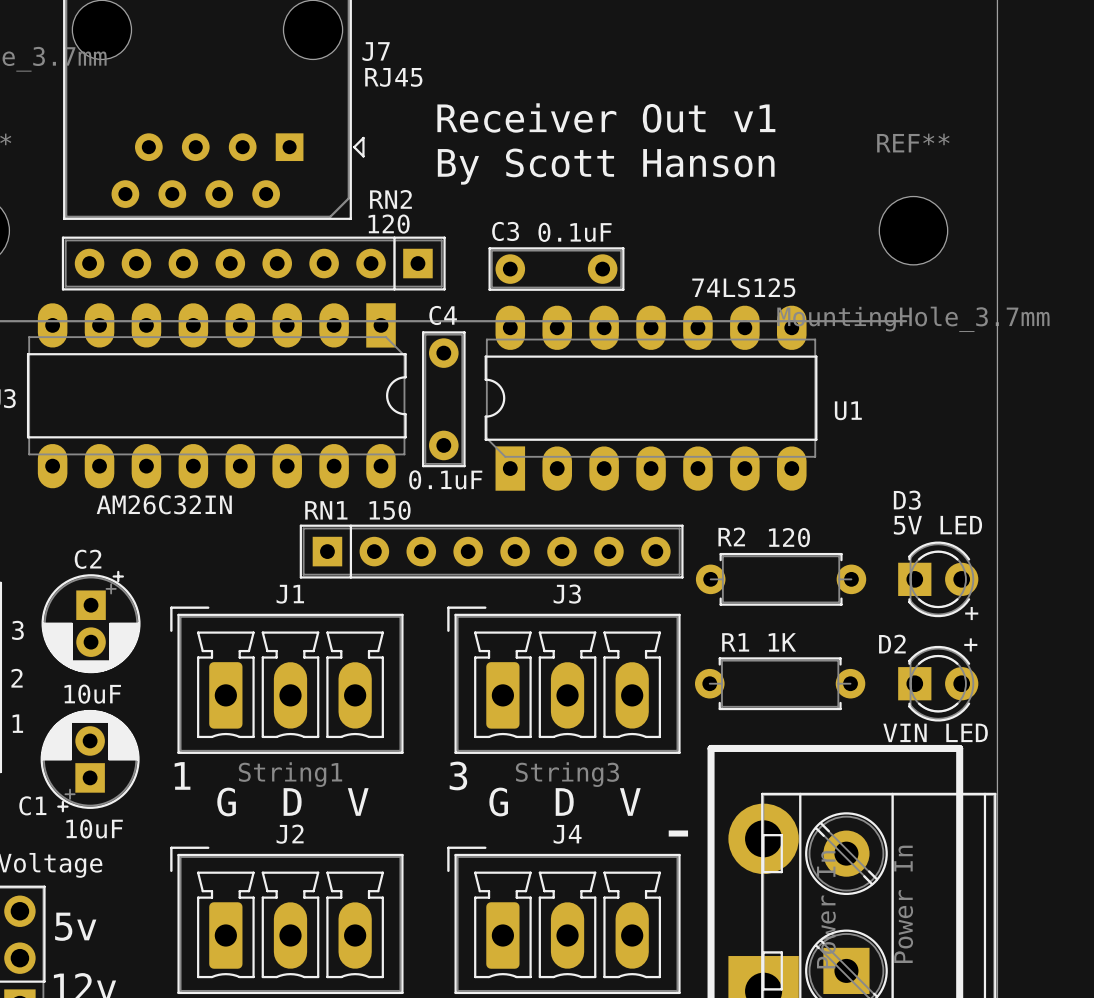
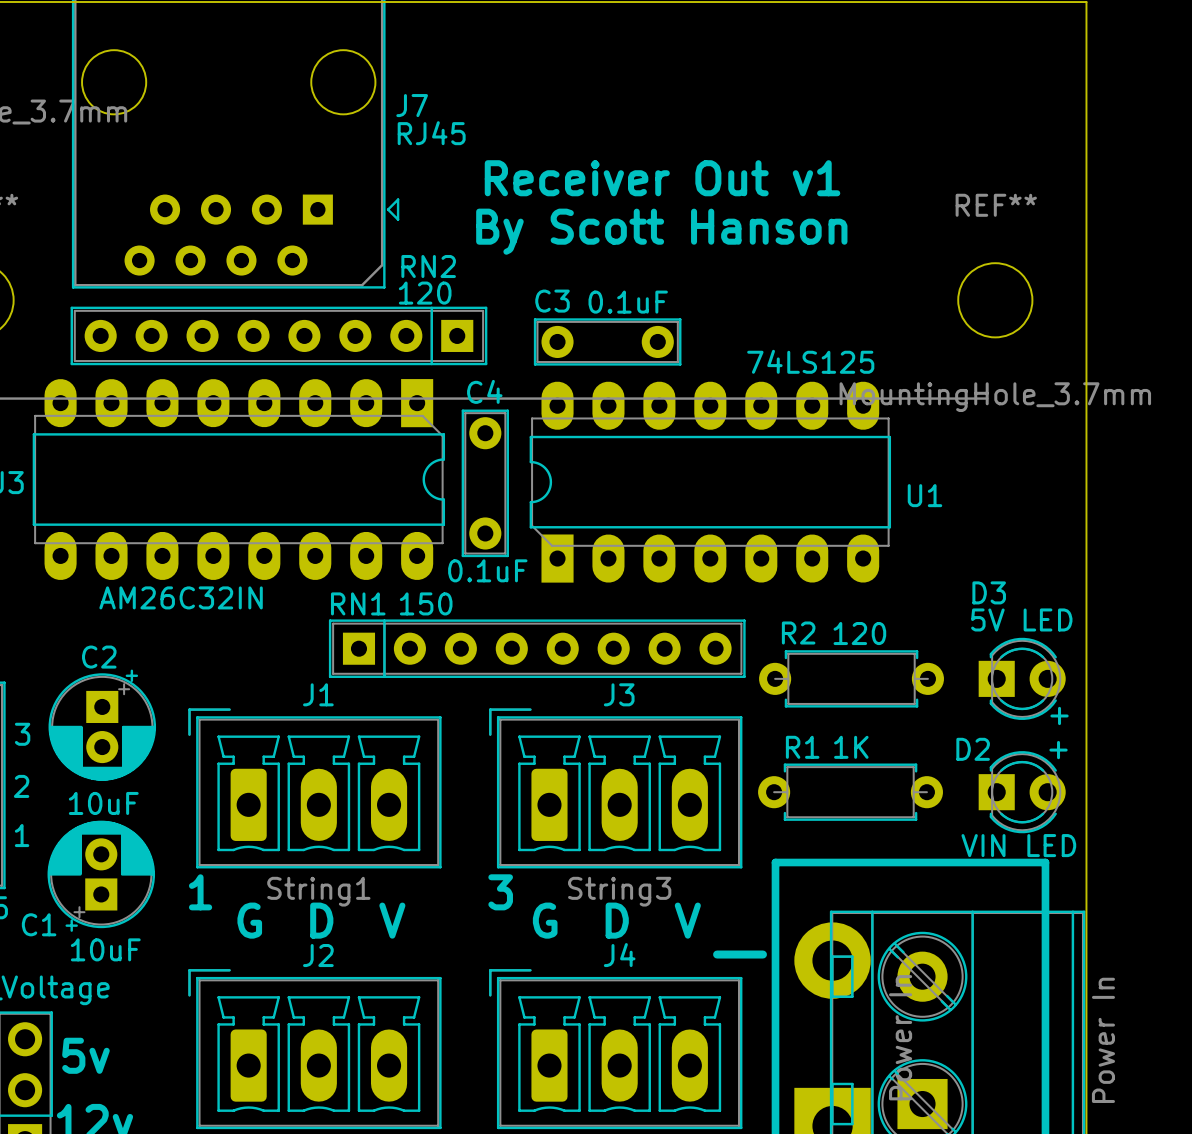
part value position: Power In (903, 904) -> Power In (1103, 1040)

